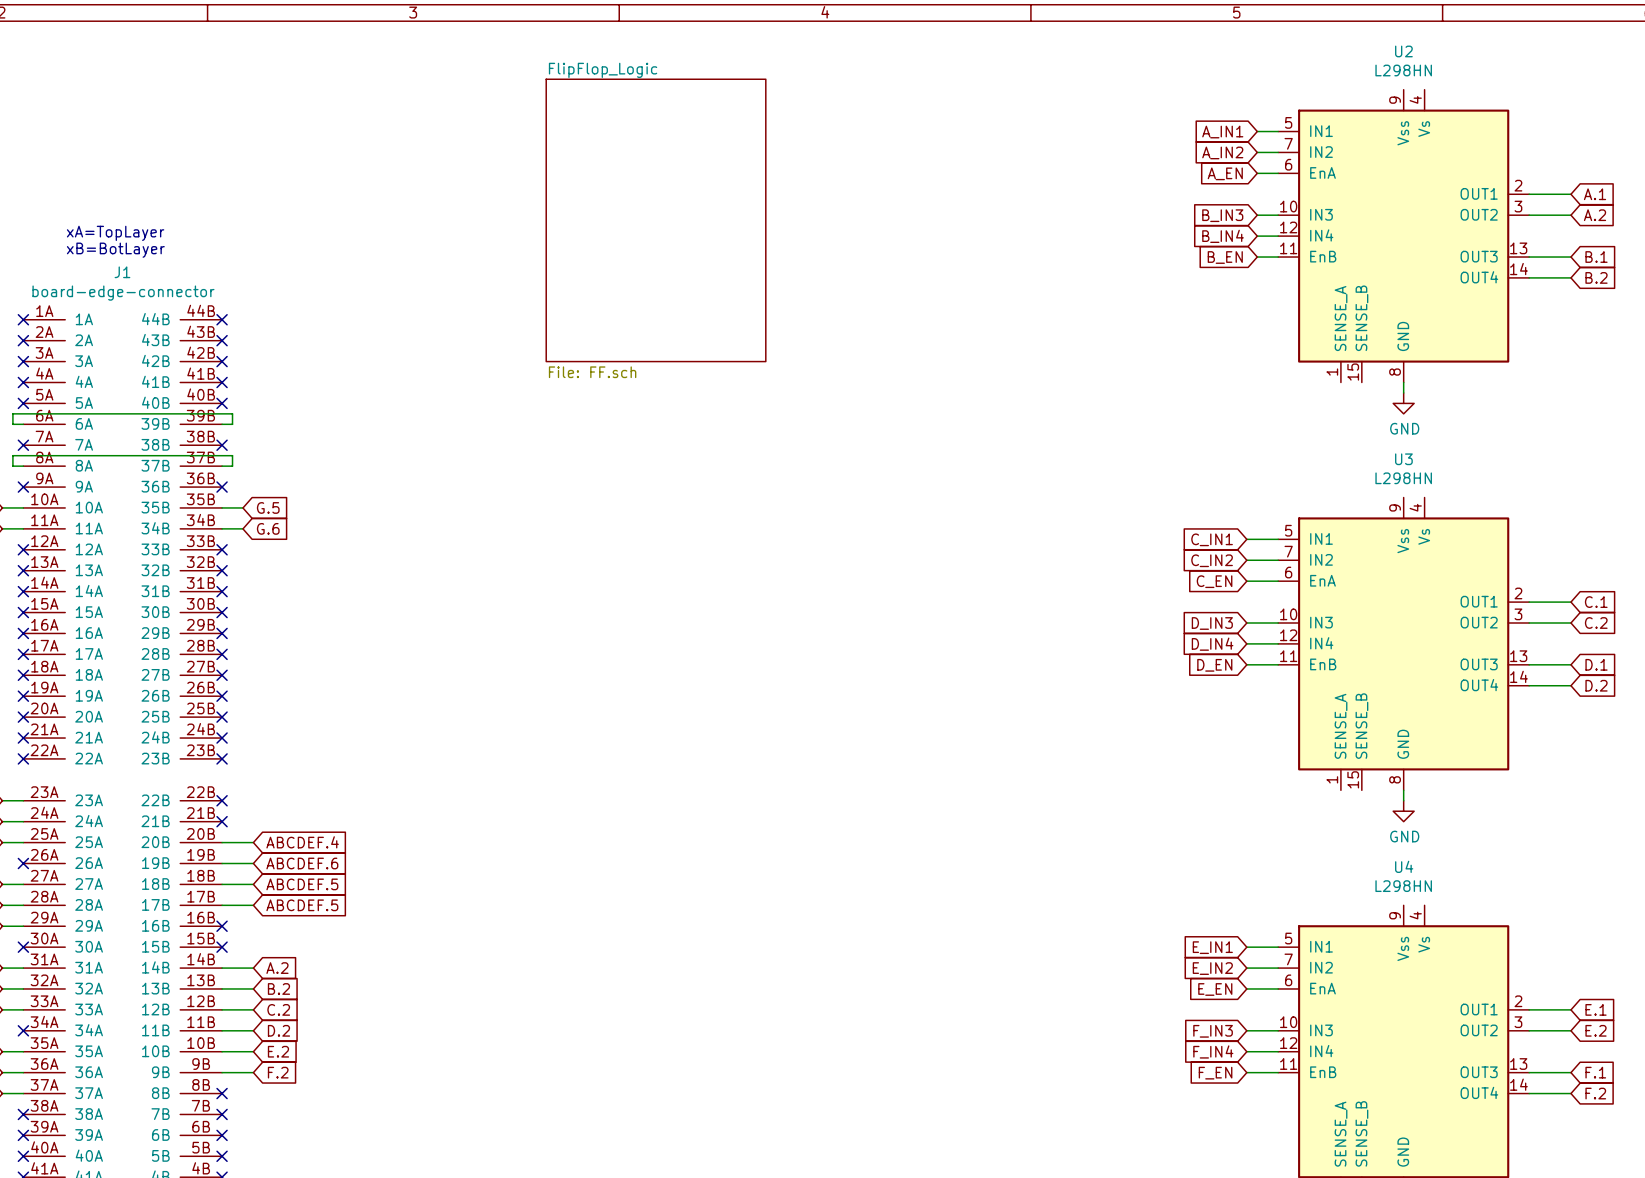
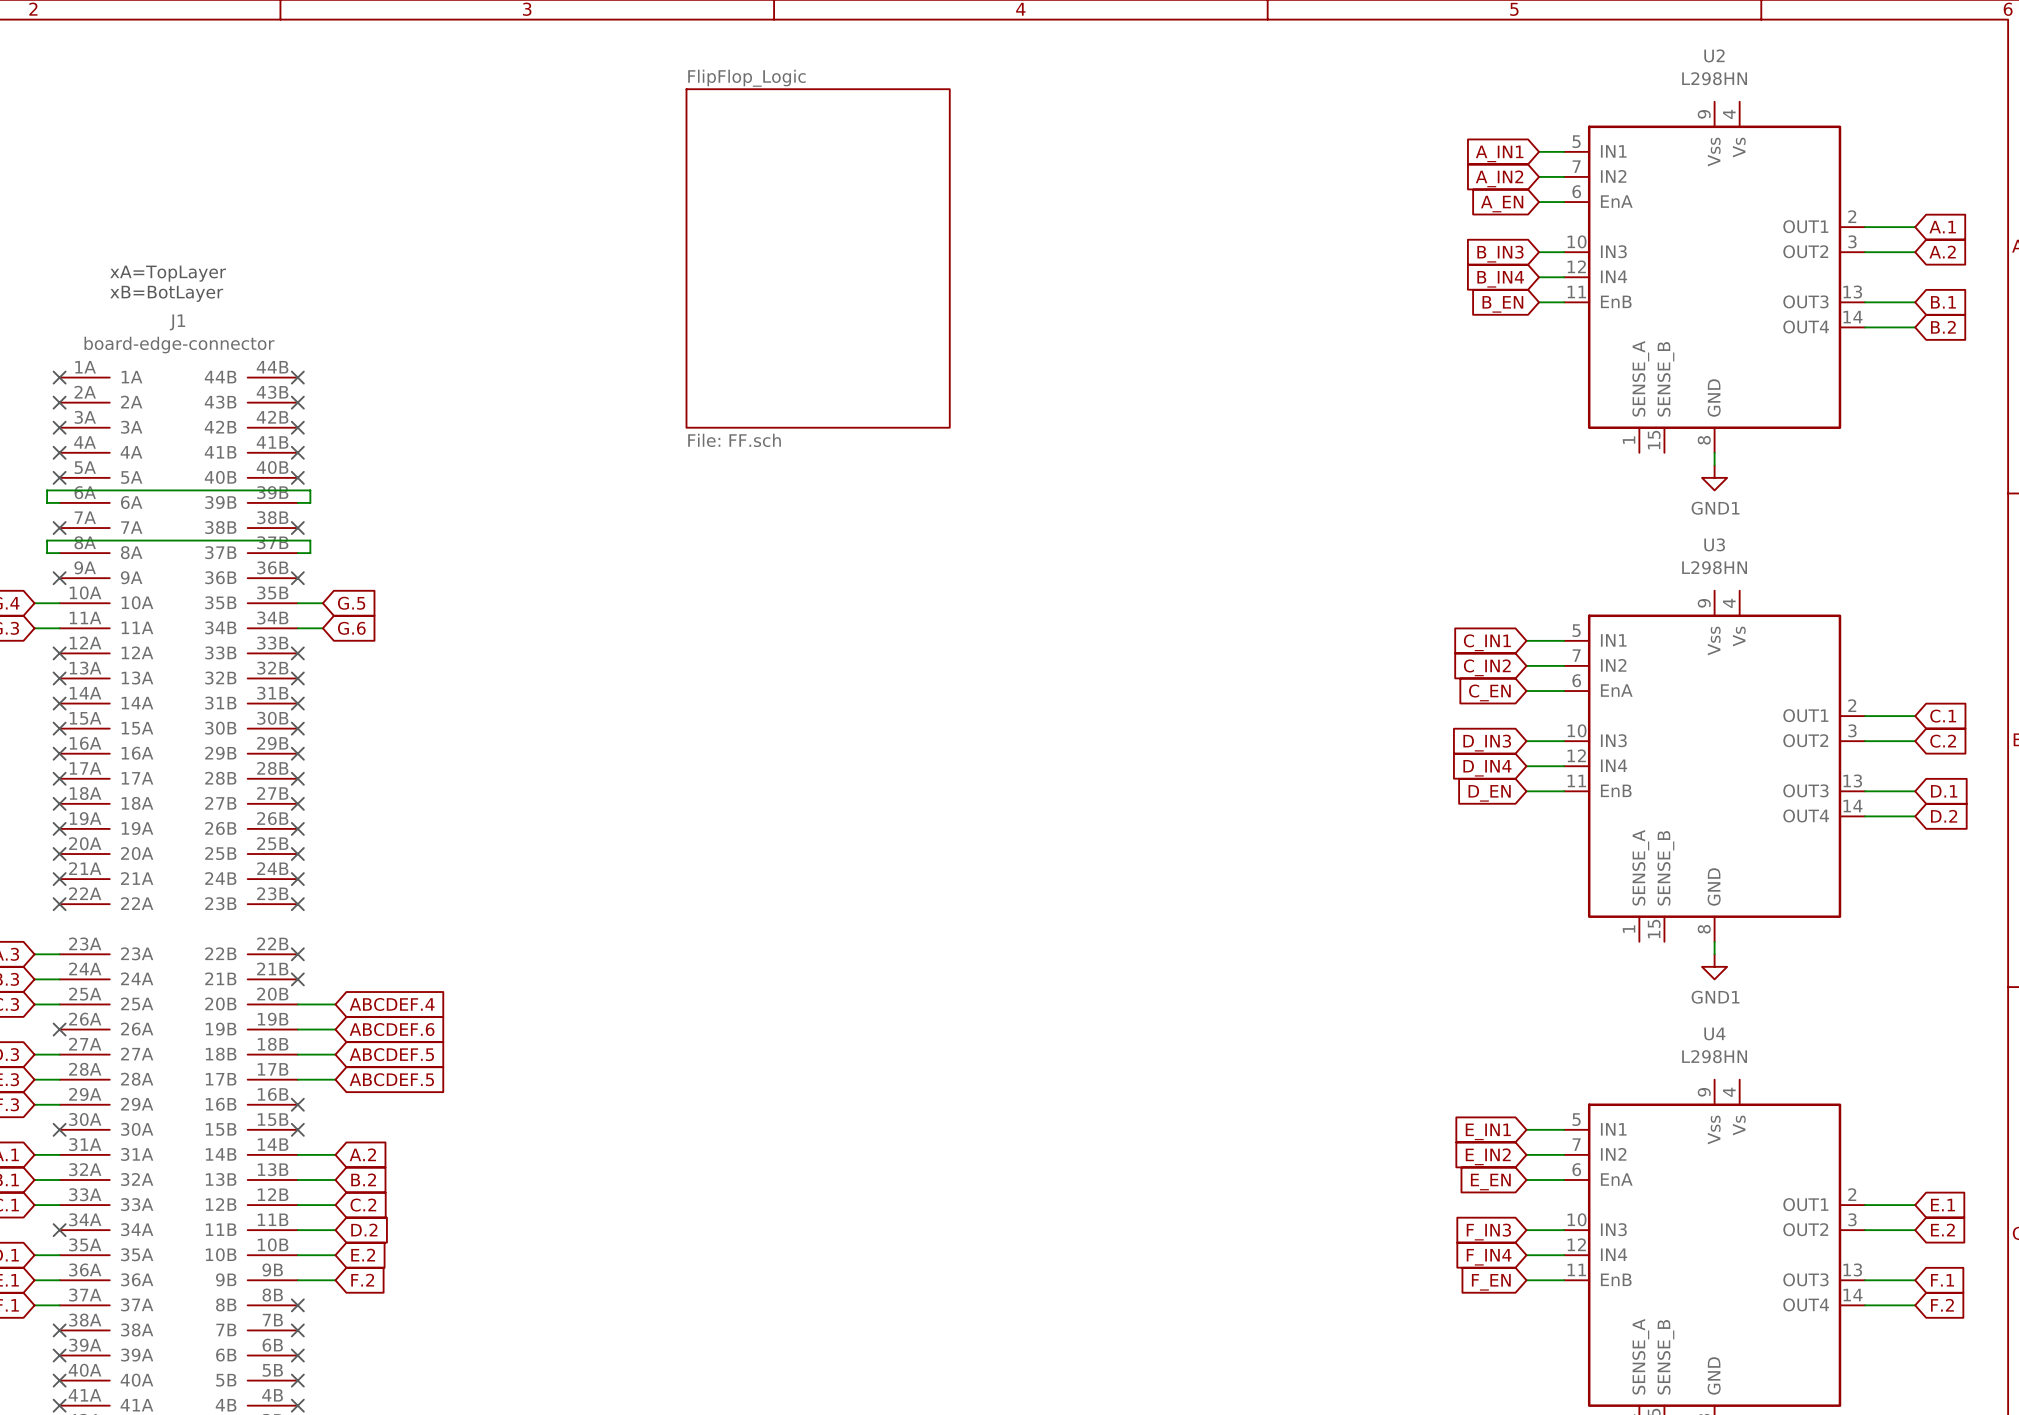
power symbol: GND (1403, 403) -> GND1 (1714, 477)
power symbol: GND (1403, 811) -> GND1 (1714, 966)

